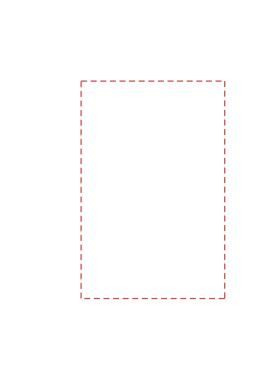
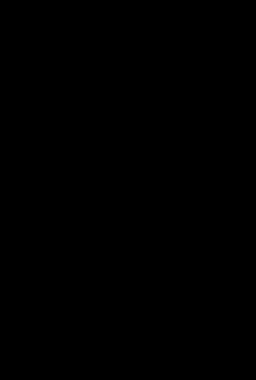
zone outline: (81, 81) (81, 298) (224, 298) (224, 81) (81, 81) -> none

